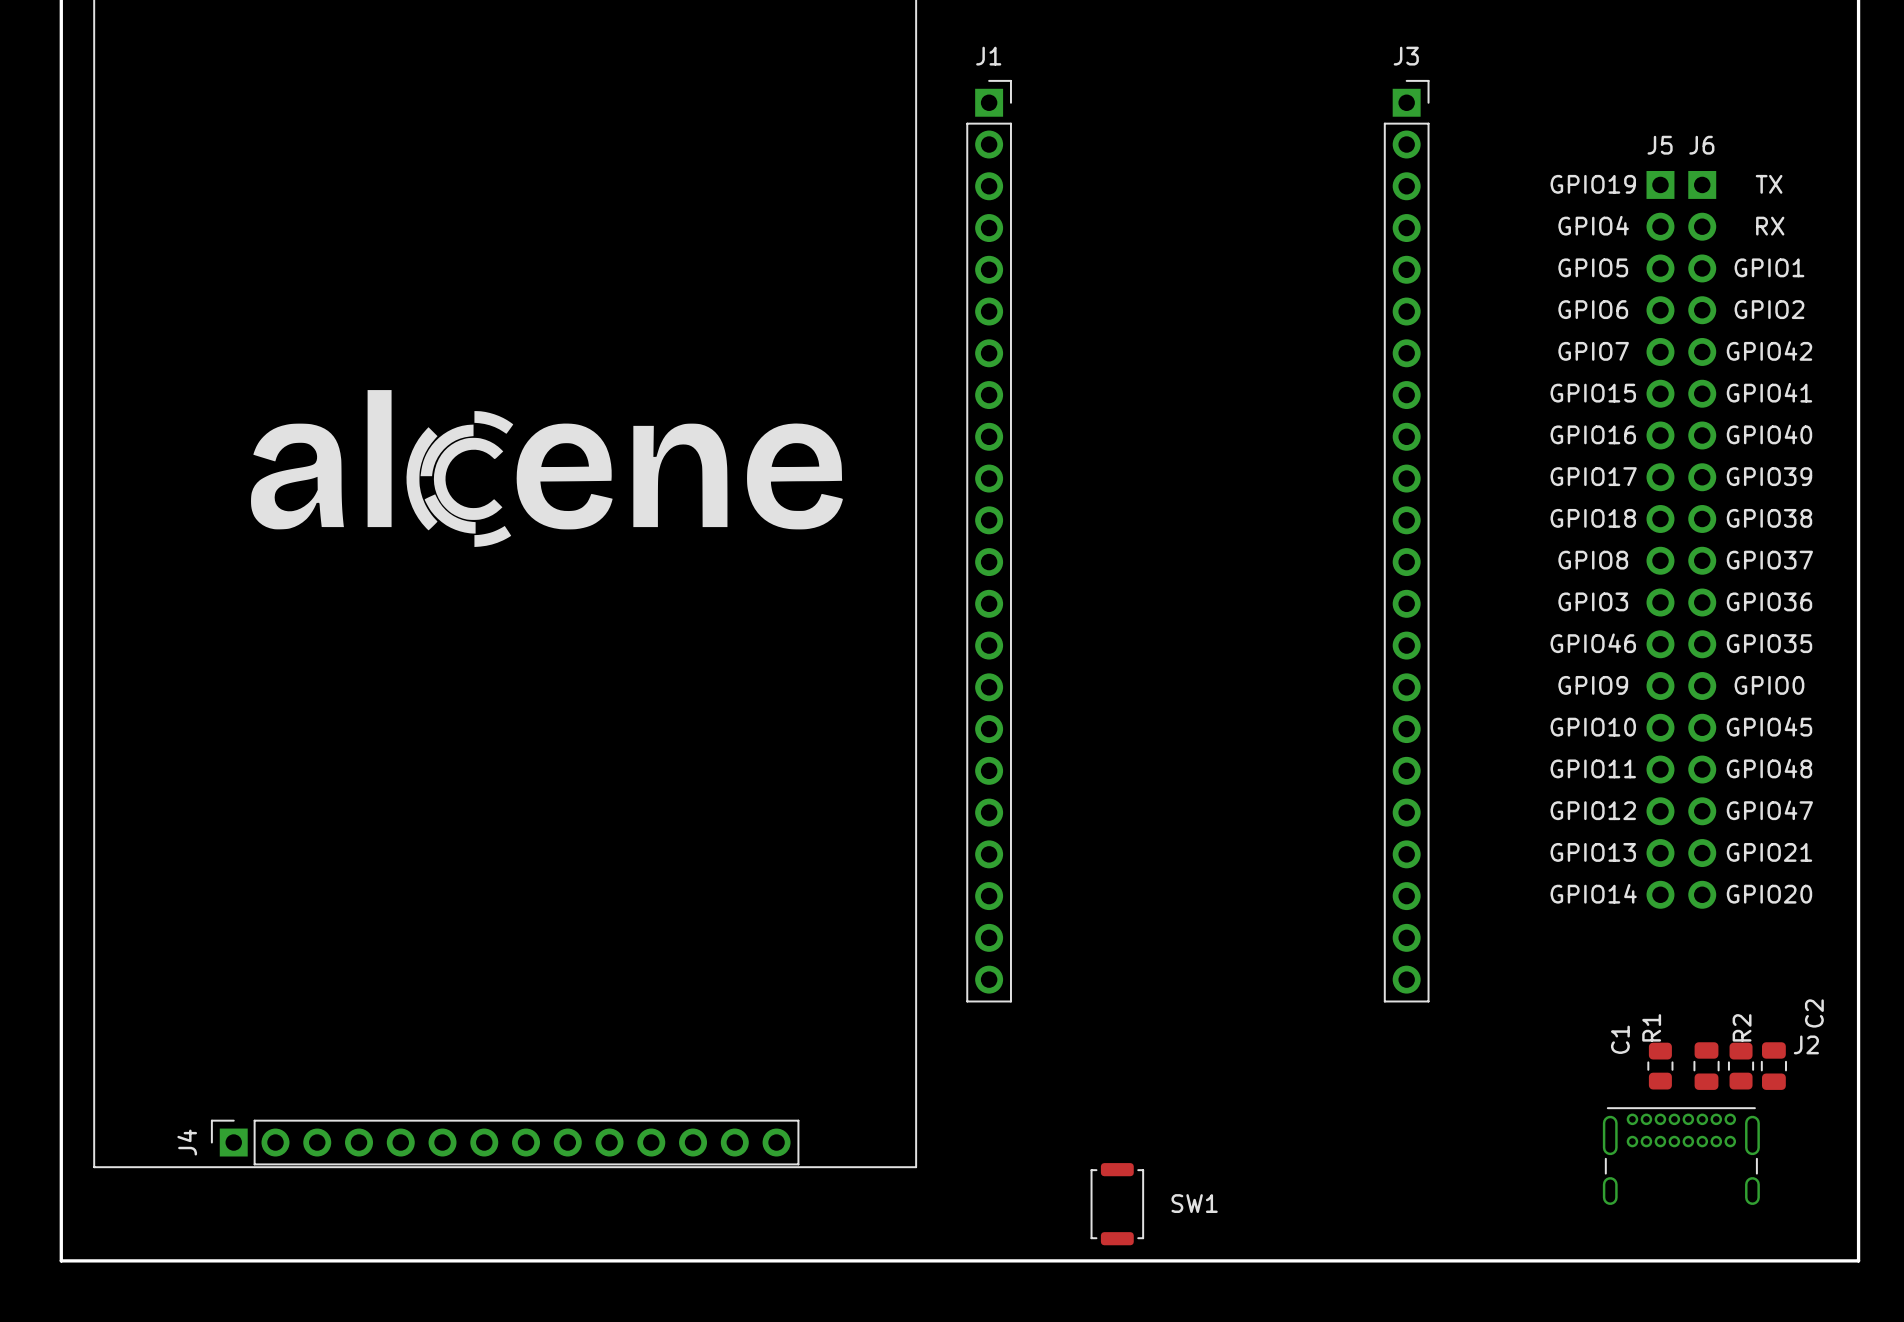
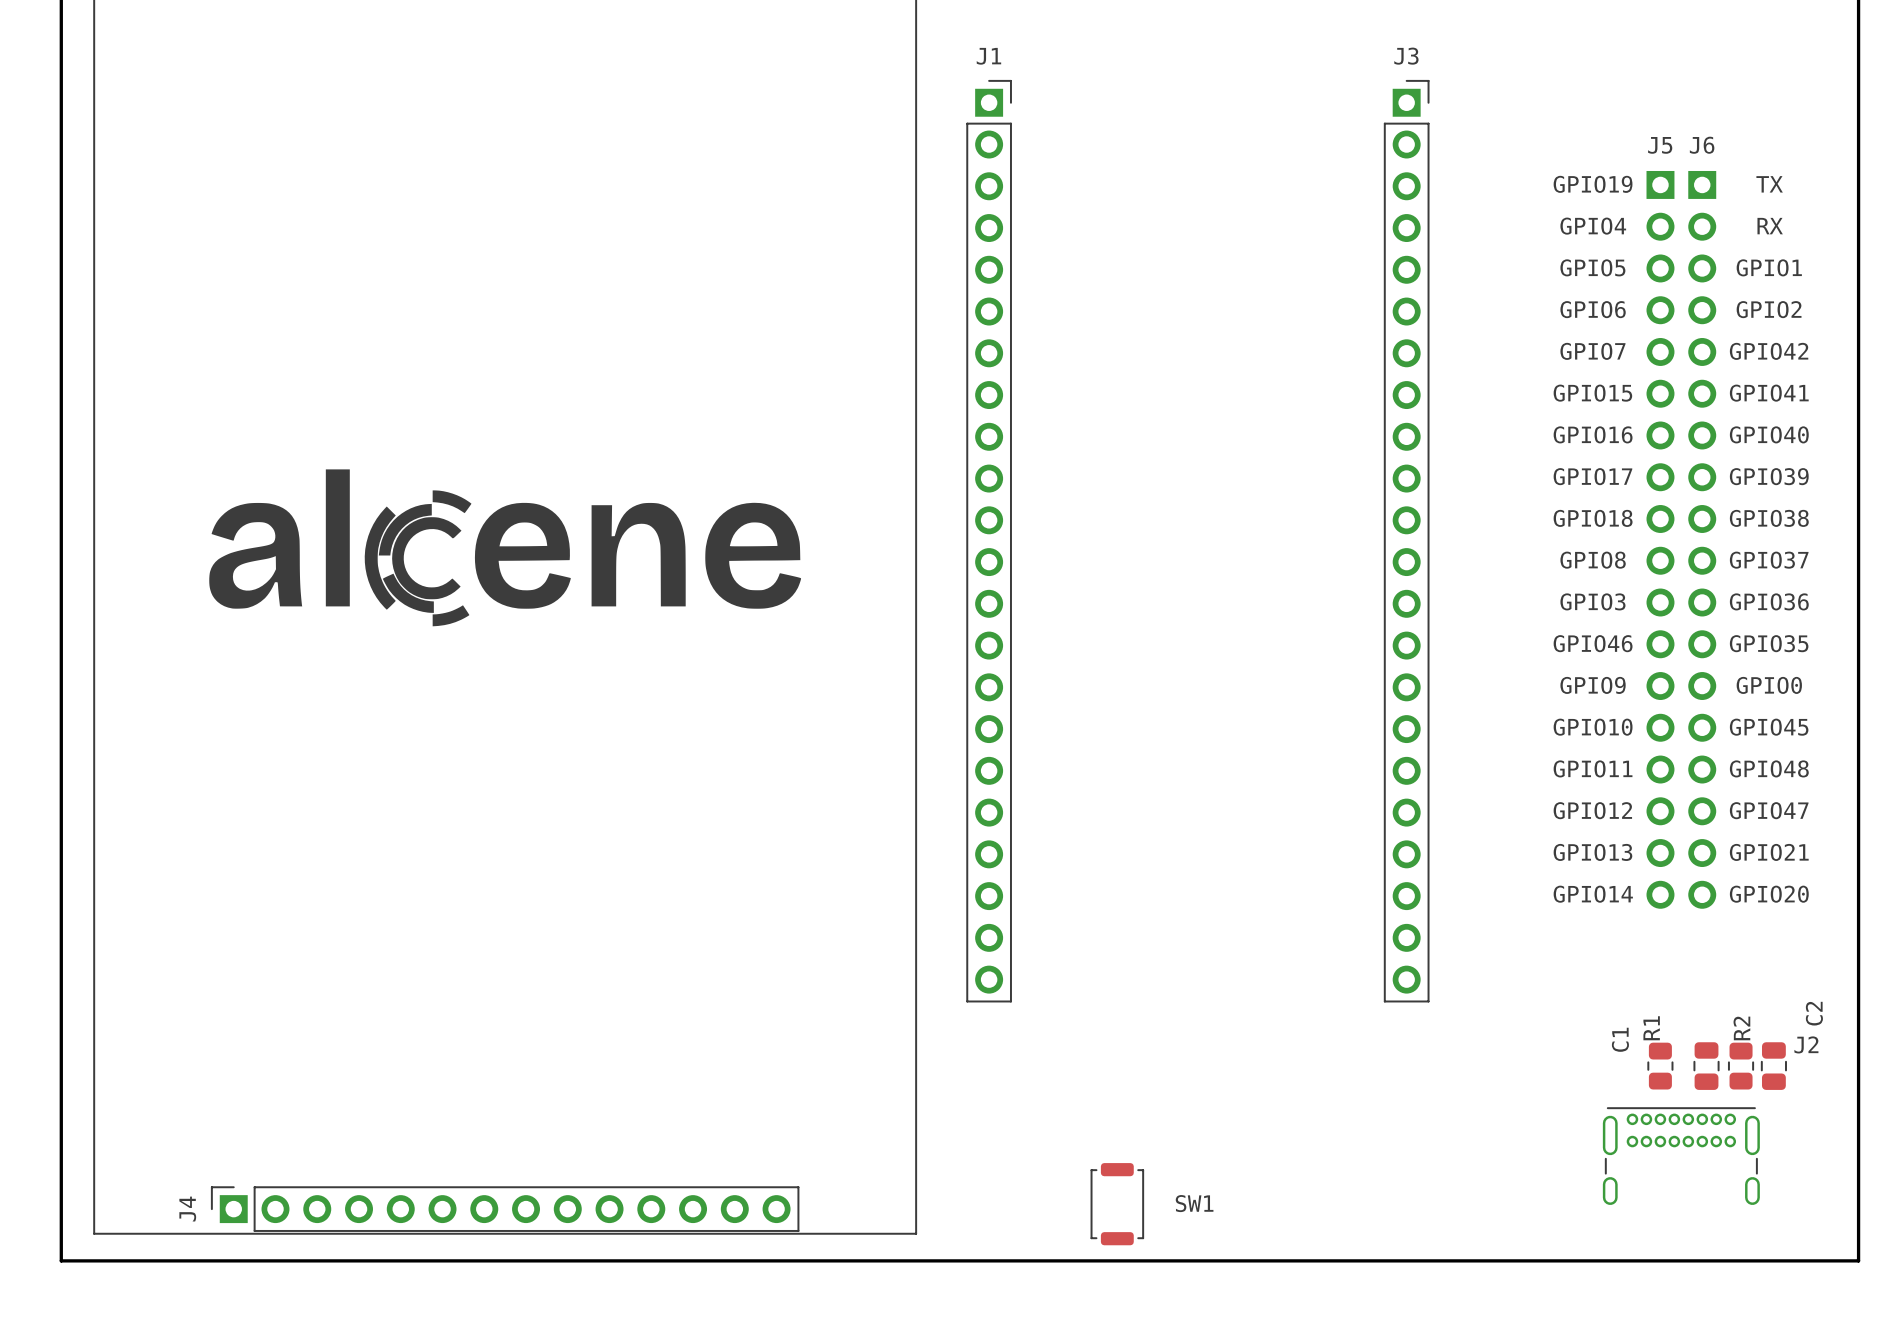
drawing position: (493, 422) -> (452, 501)
drawing position: (447, 450) -> (405, 529)
drawing position: (379, 458) -> (337, 537)
drawing position: (680, 475) -> (638, 554)
drawing position: (297, 476) -> (255, 555)
drawing position: (564, 476) -> (522, 555)
drawing position: (794, 476) -> (753, 555)
drawing position: (422, 478) -> (380, 558)
drawing position: (468, 478) -> (426, 558)
drawing position: (450, 513) -> (408, 593)
drawing position: (492, 536) -> (451, 615)
J4 position: (505, 1142) -> (505, 1209)
line: (94, 1167) (916, 1167) -> (94, 1167) (94, 1233) (916, 1233) (916, 1167)

